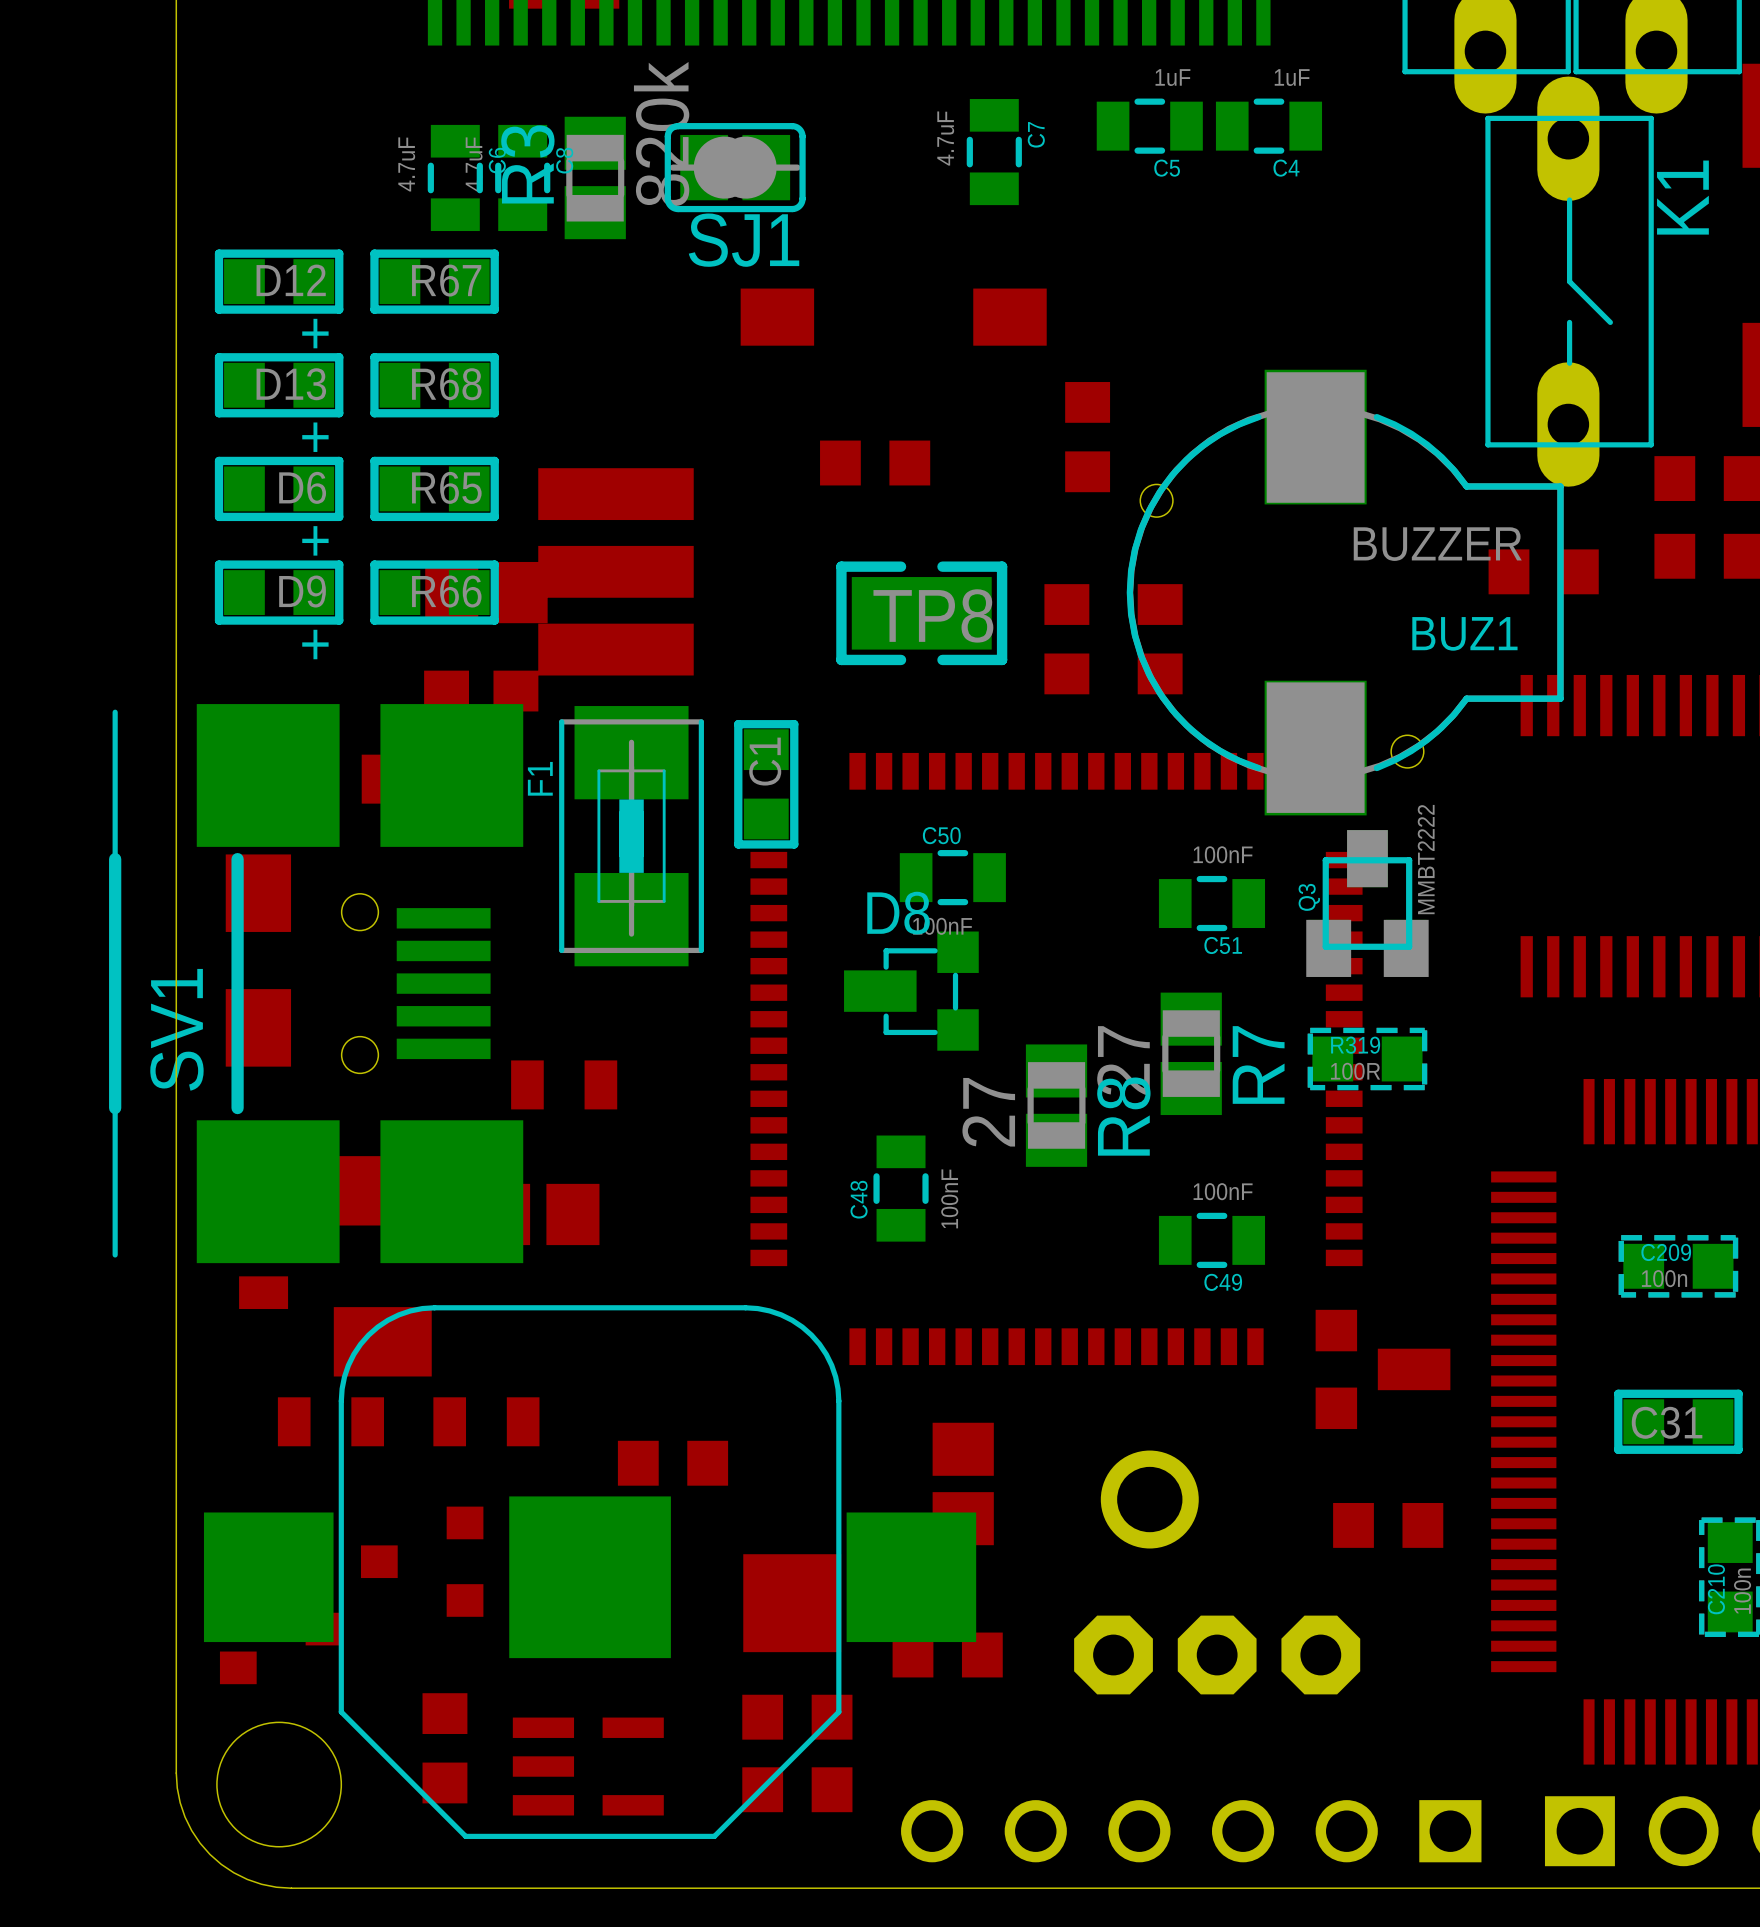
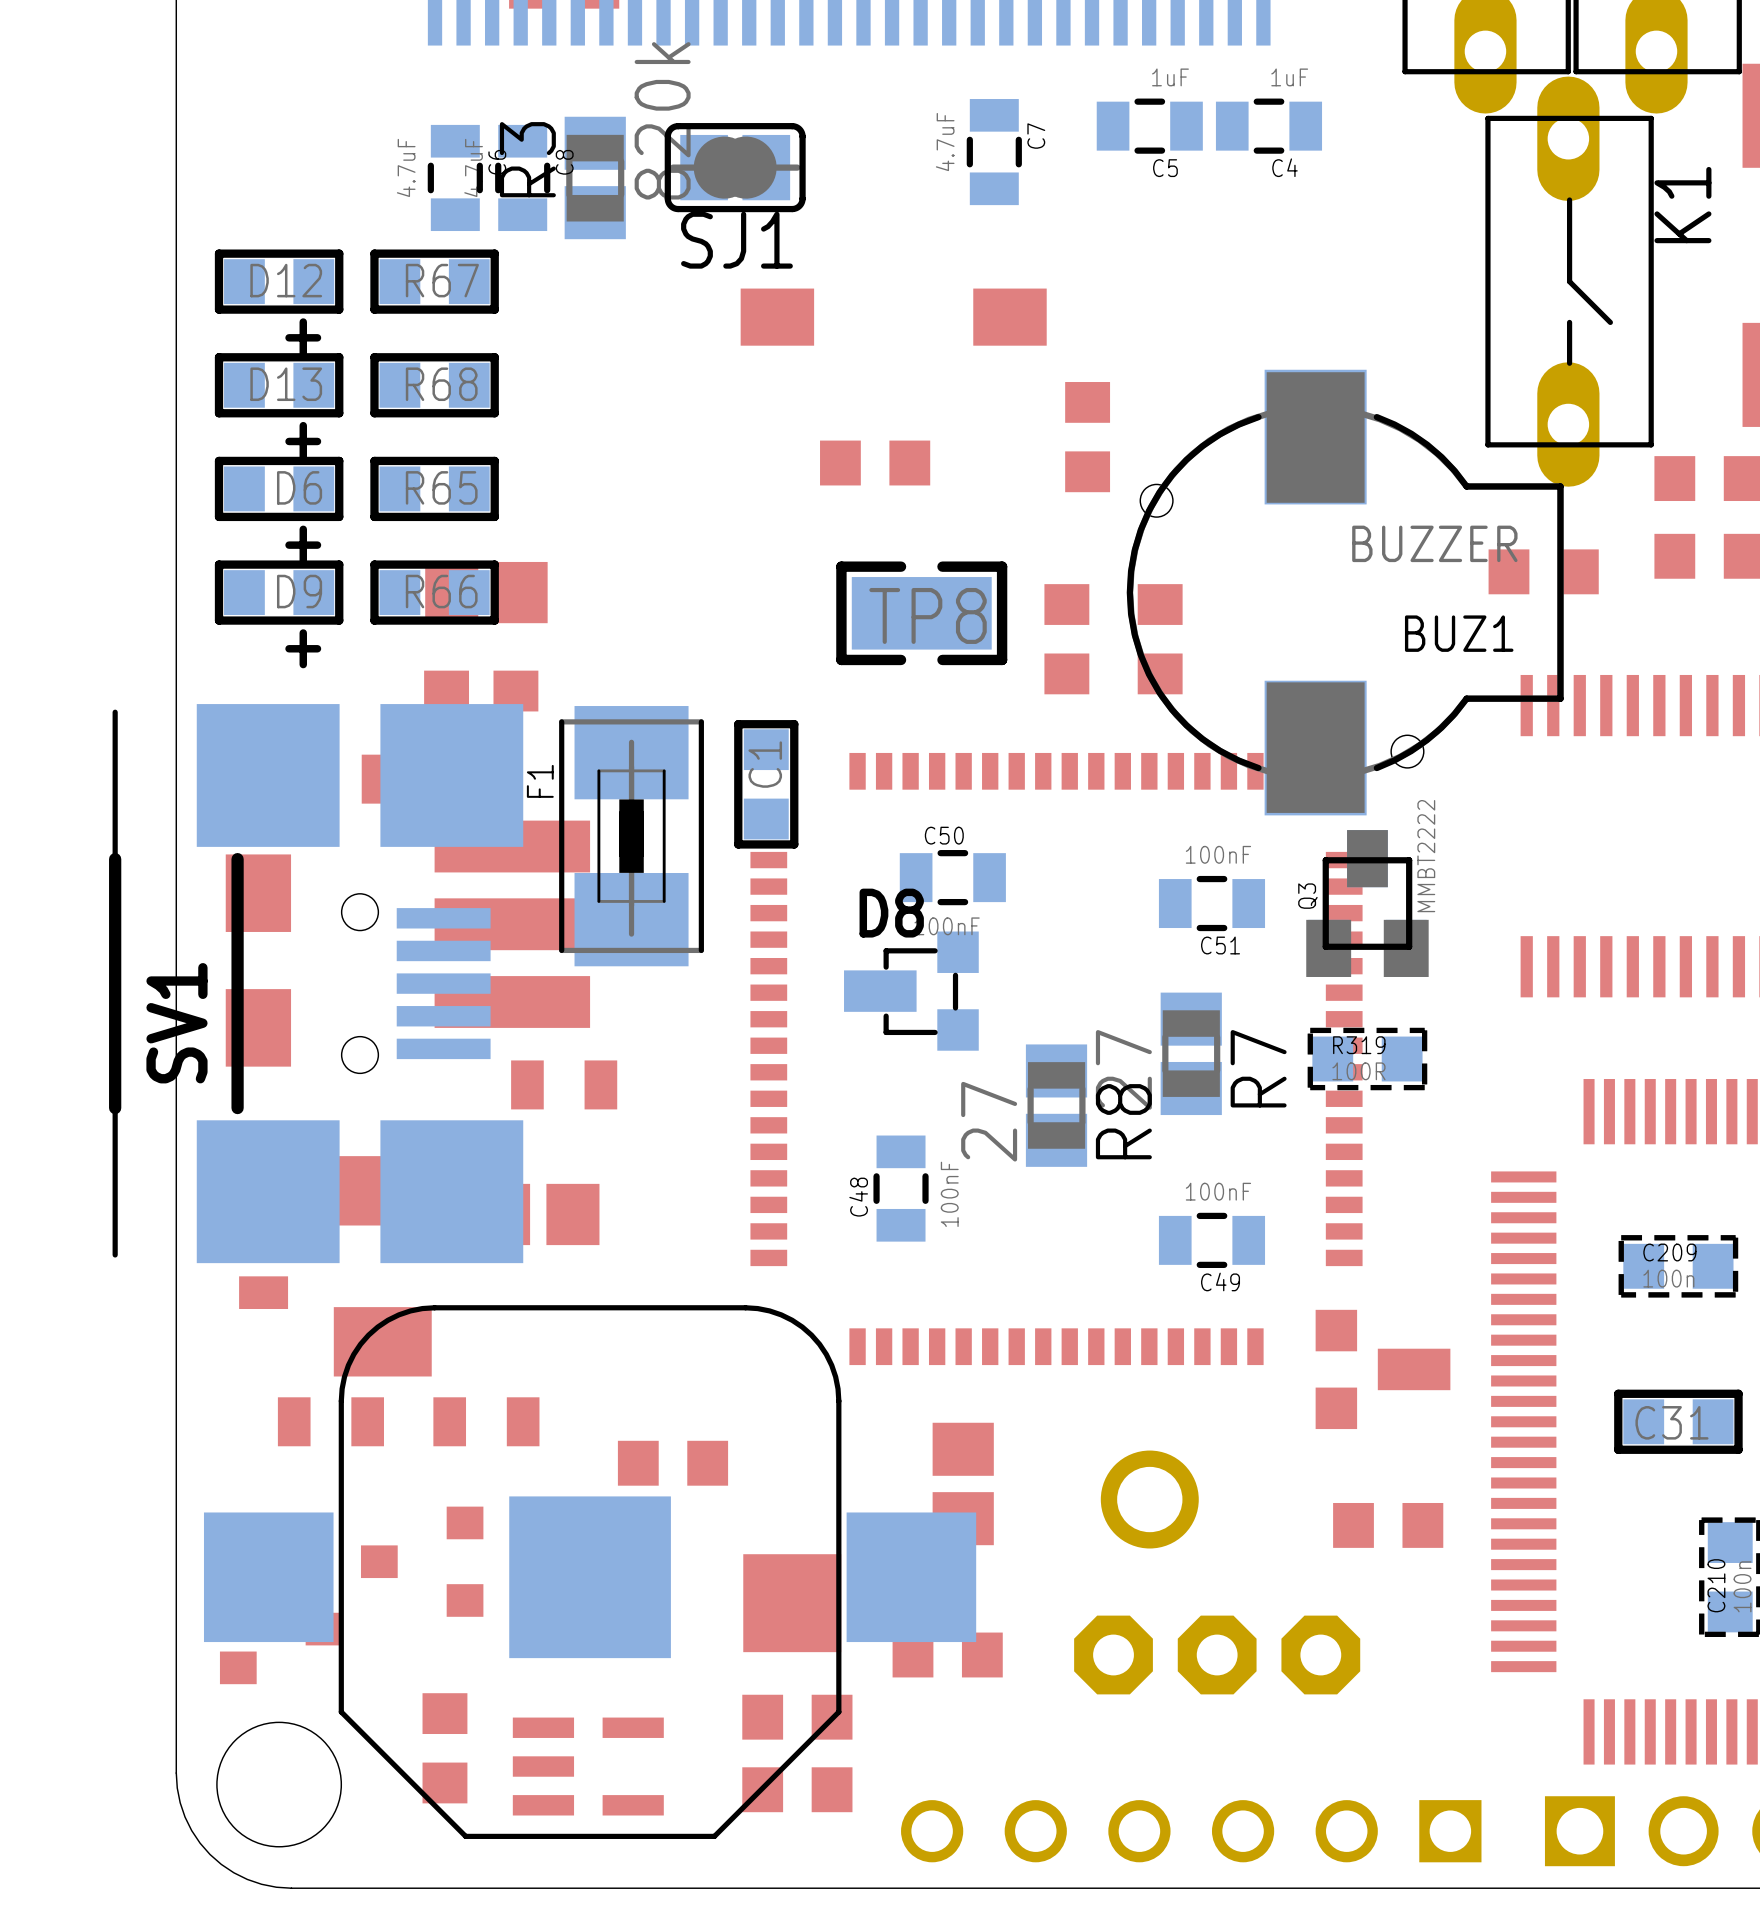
part position: (615, 571) -> (512, 924)

